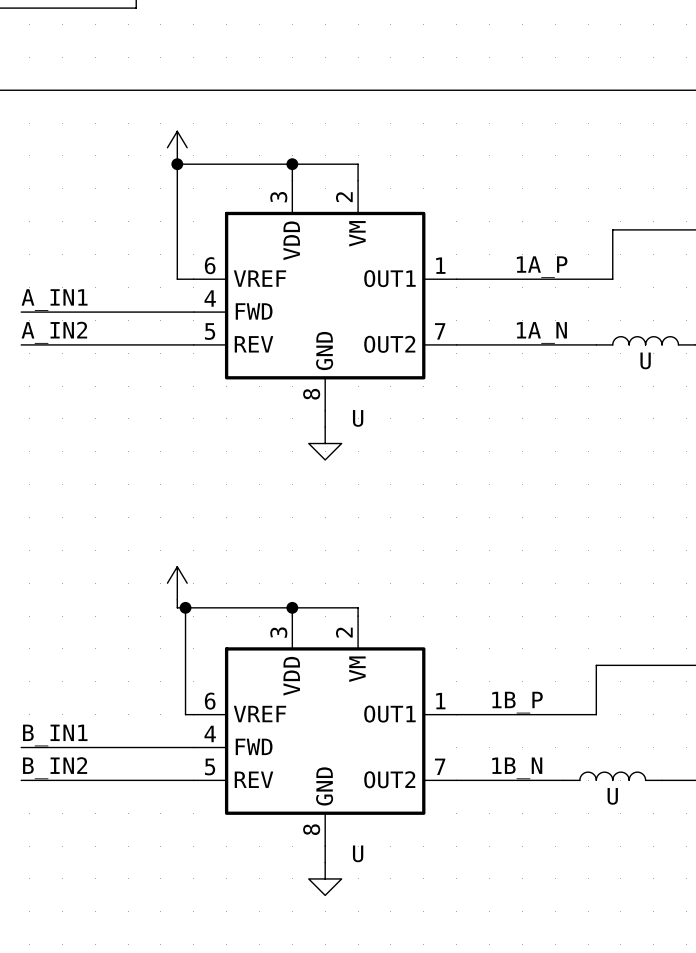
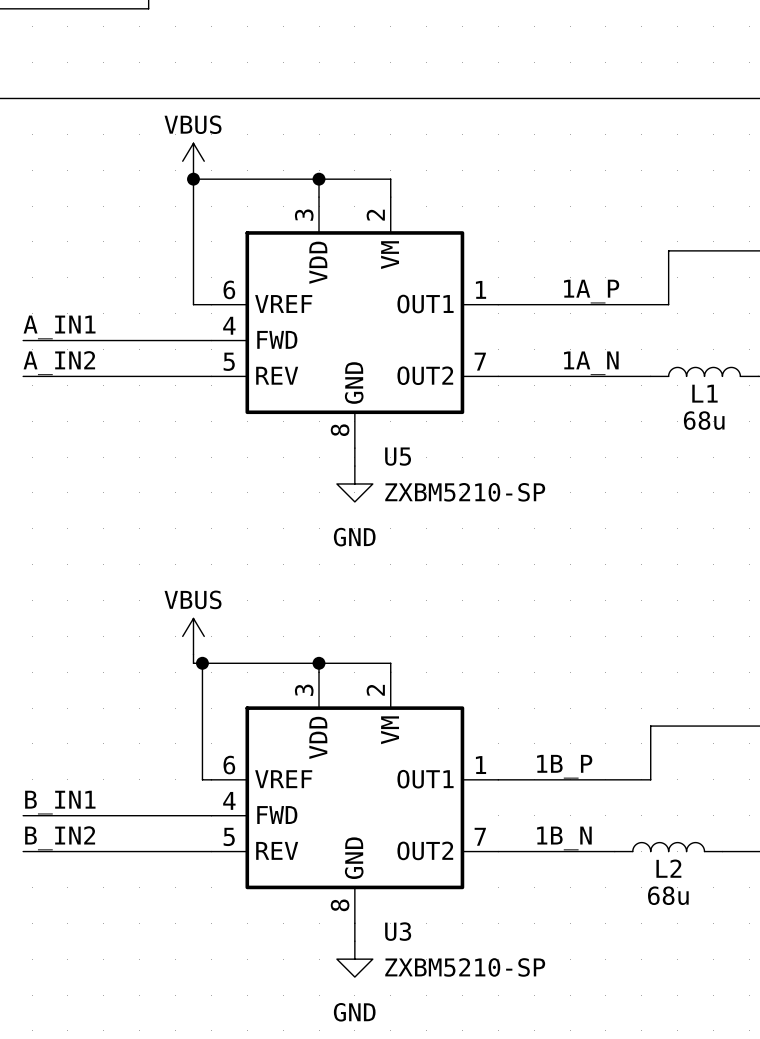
power symbol text: none -> VBUS (193, 124)
U name: U (645, 360) -> L1 (704, 393)
U value: none -> 68u (704, 420)
U name: U (358, 418) -> U5 (398, 456)
U value: none -> ZXBM5210-SP (465, 492)
power symbol text: none -> GND (354, 537)
power symbol text: none -> VBUS (193, 599)
U name: U (612, 796) -> L2 (668, 868)
U value: none -> 68u (668, 895)
U name: U (358, 853) -> U3 (398, 931)
U value: none -> ZXBM5210-SP (465, 967)
power symbol text: none -> GND (354, 1012)

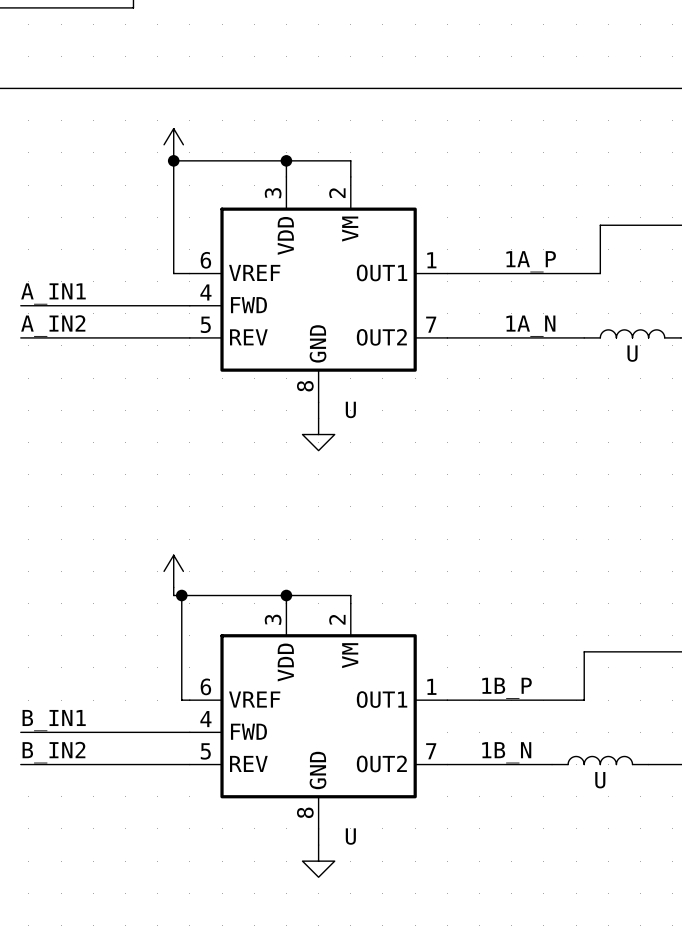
power symbol text: VBUS (193, 124) -> none
L1 name: L1 (704, 393) -> U (632, 353)
L1 value: 68u (704, 420) -> none
U5 name: U5 (398, 456) -> U (350, 409)
U5 value: ZXBM5210-SP (465, 492) -> none
power symbol text: GND (354, 537) -> none
power symbol text: VBUS (193, 599) -> none
L2 name: L2 (668, 868) -> U (600, 780)
L2 value: 68u (668, 895) -> none
U3 name: U3 (398, 931) -> U (350, 836)
U3 value: ZXBM5210-SP (465, 967) -> none
power symbol text: GND (354, 1012) -> none

